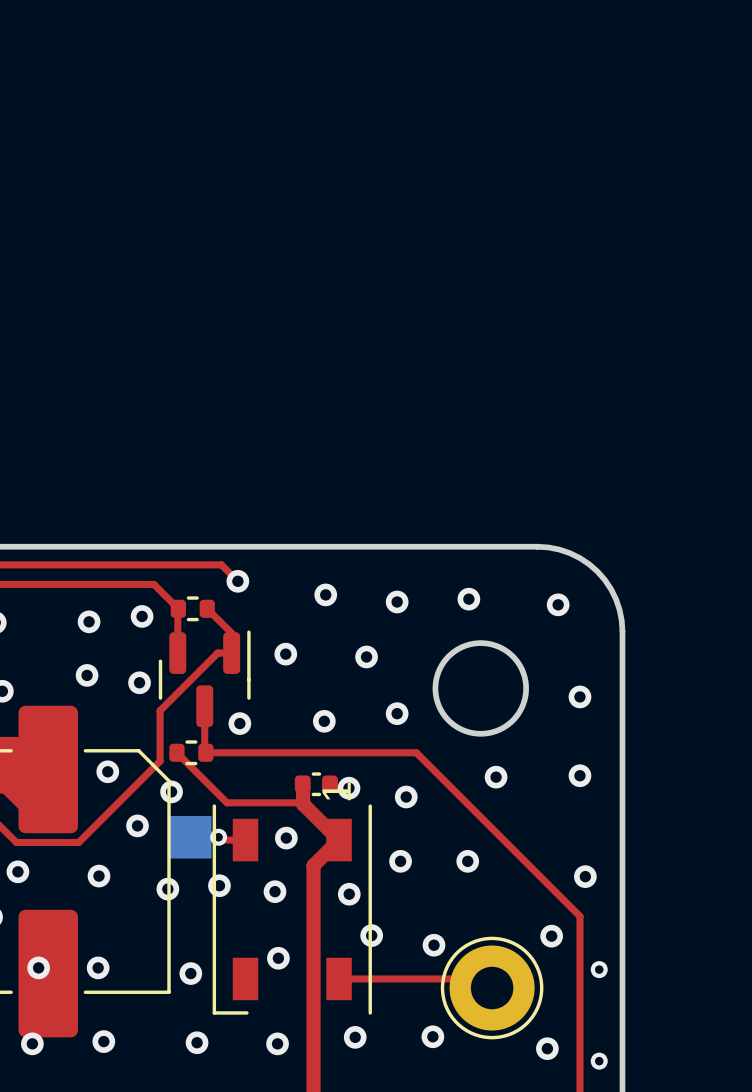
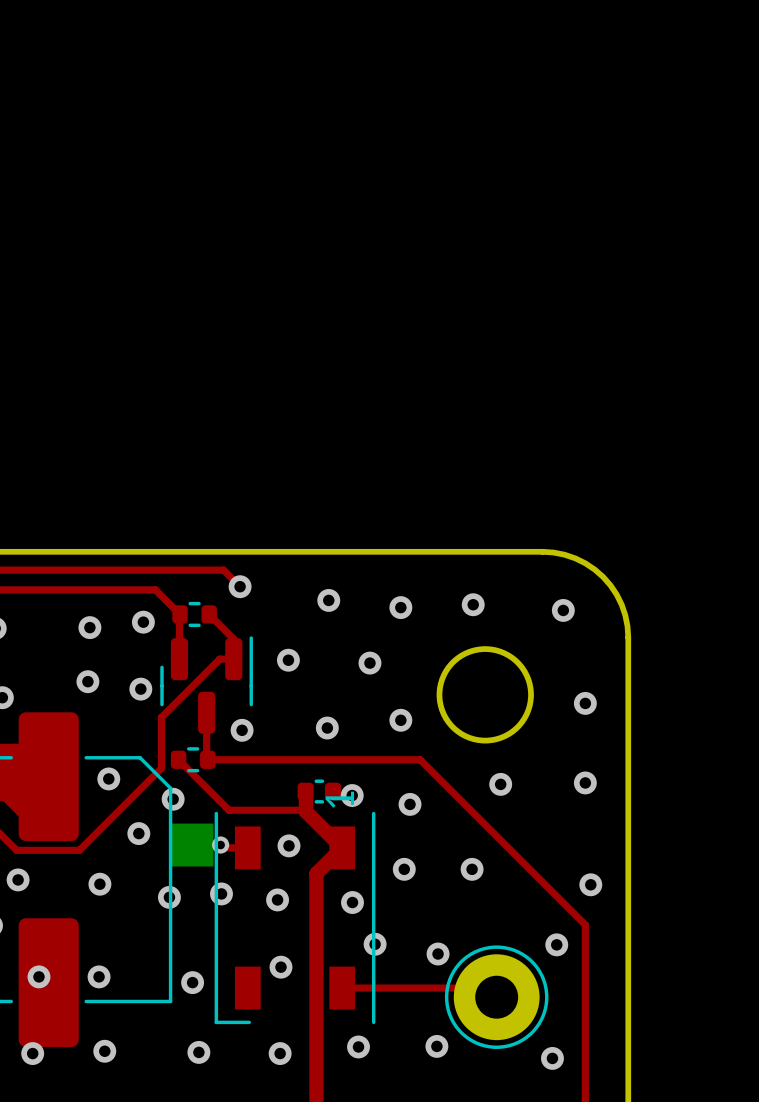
via: (599, 969) -> none
via: (599, 1061) -> none

